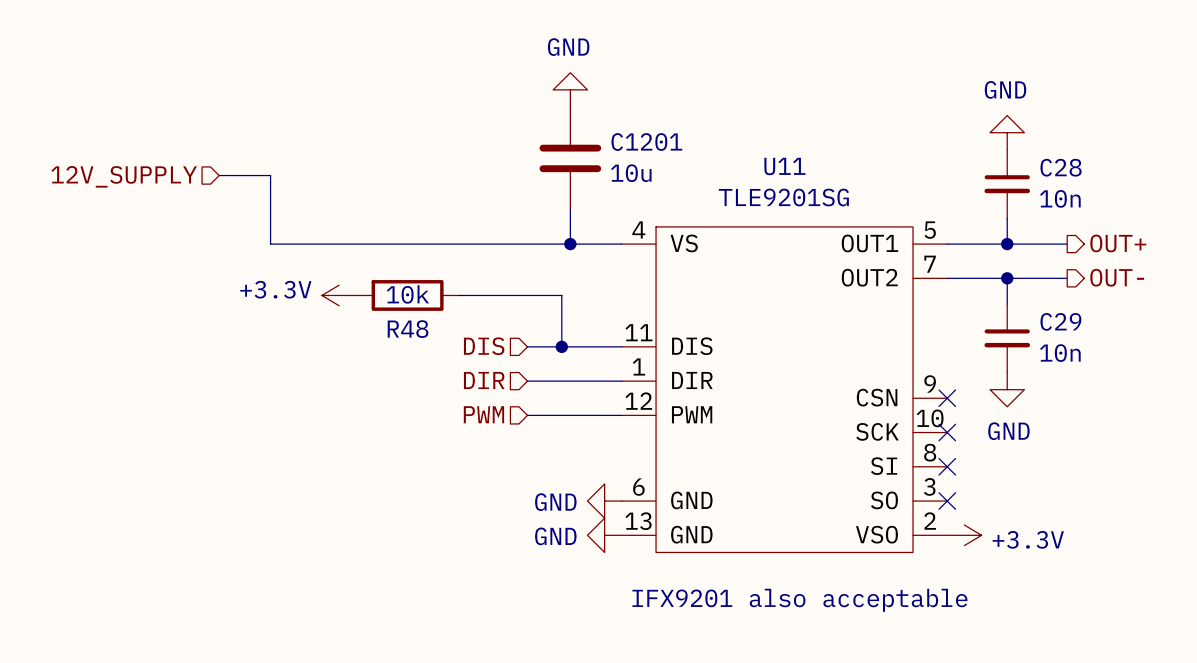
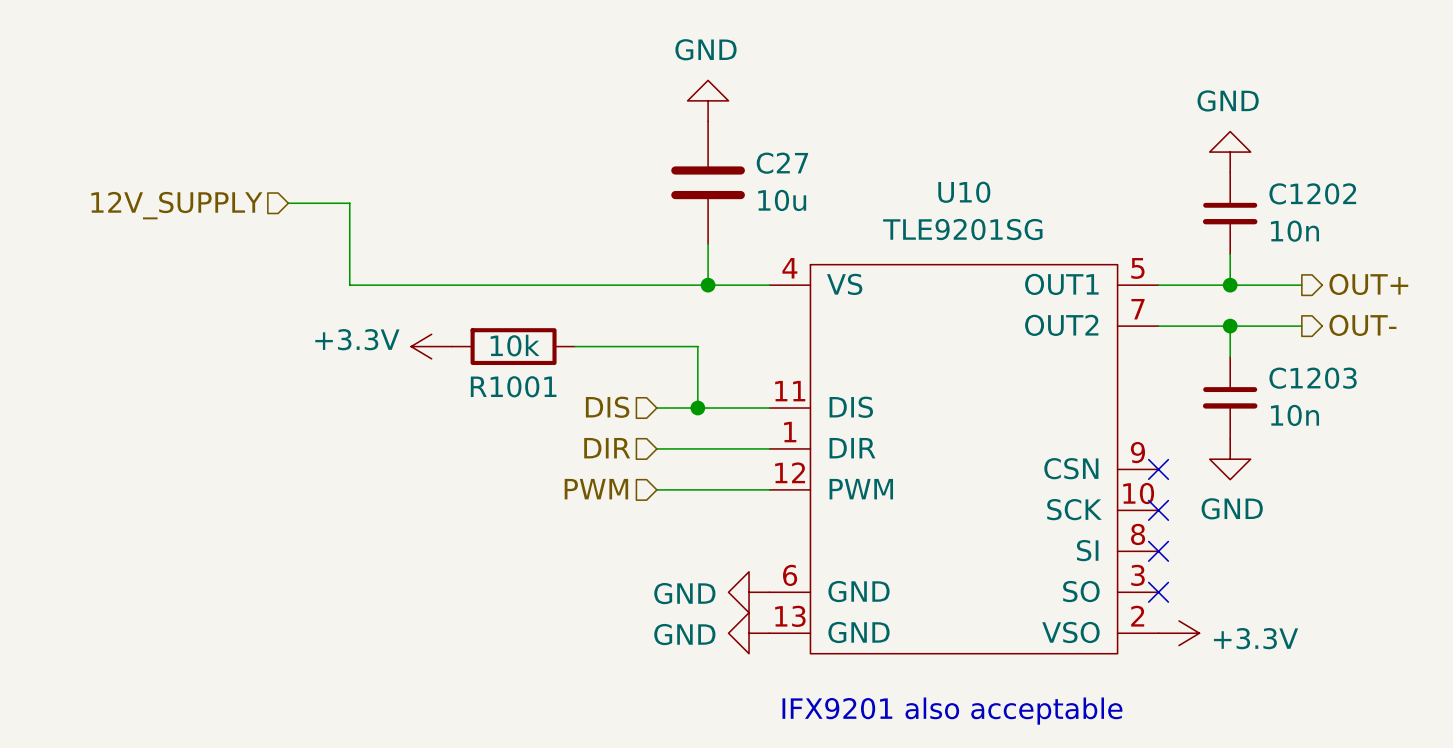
C1201 name: C1201 (646, 142) -> C27 (782, 163)
U11 name: U11 (784, 166) -> U10 (964, 192)
C28 name: C28 (1061, 167) -> C1202 (1312, 193)
C29 name: C29 (1060, 321) -> C1203 (1313, 378)
R48 name: R48 (408, 329) -> R1001 (513, 386)

